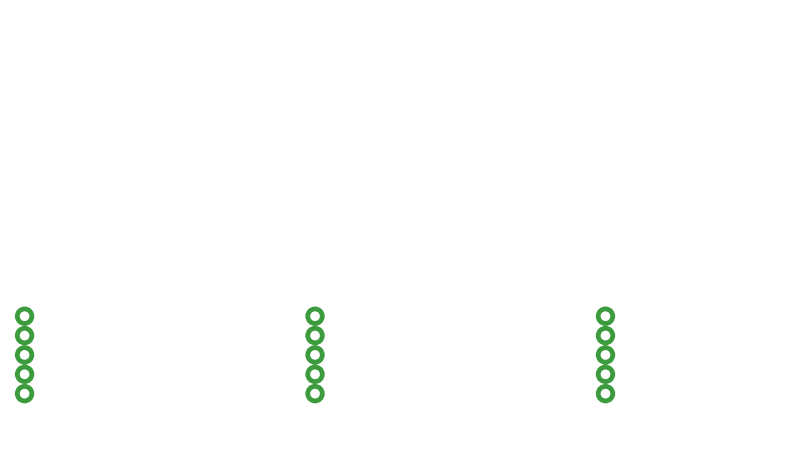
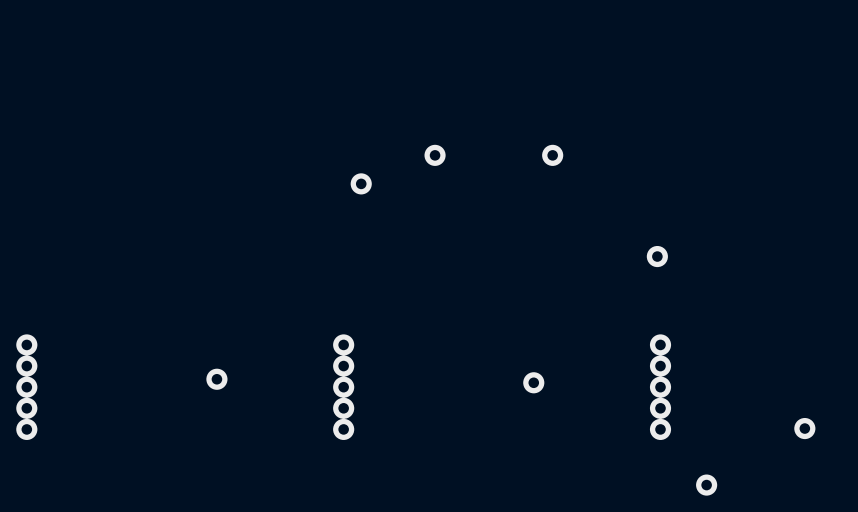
via: none -> (435, 155)
via: none -> (552, 155)
via: none -> (361, 183)
via: none -> (657, 256)
via: none -> (216, 379)
via: none -> (533, 382)
via: none -> (804, 428)
via: none -> (706, 485)

